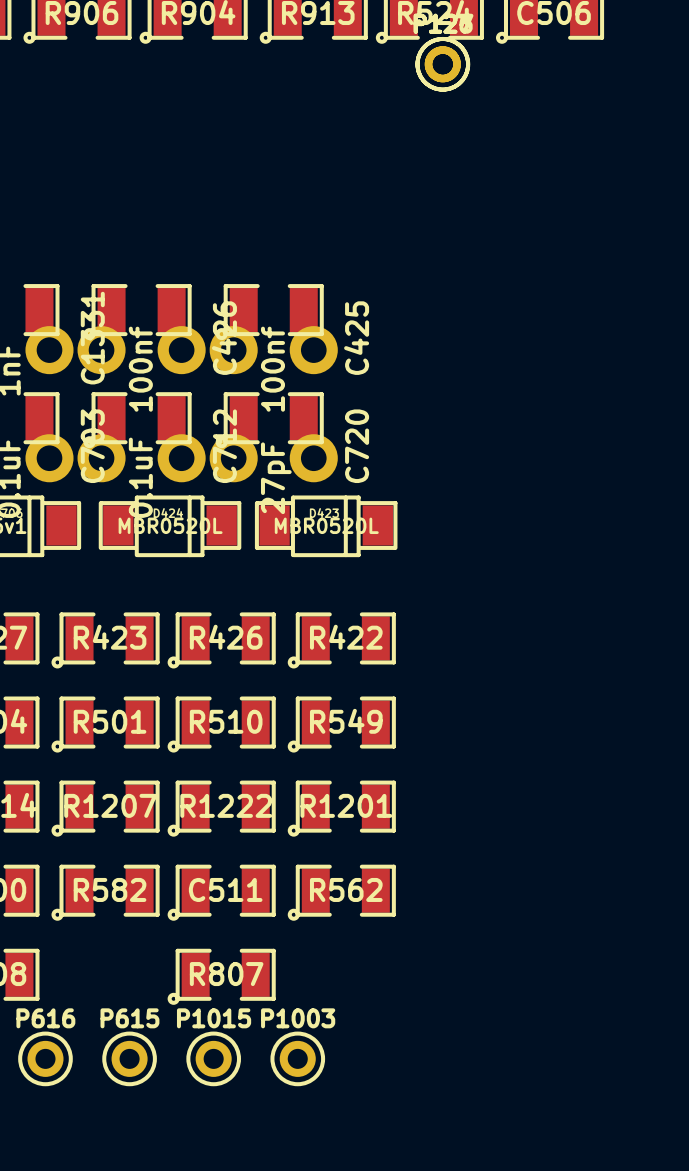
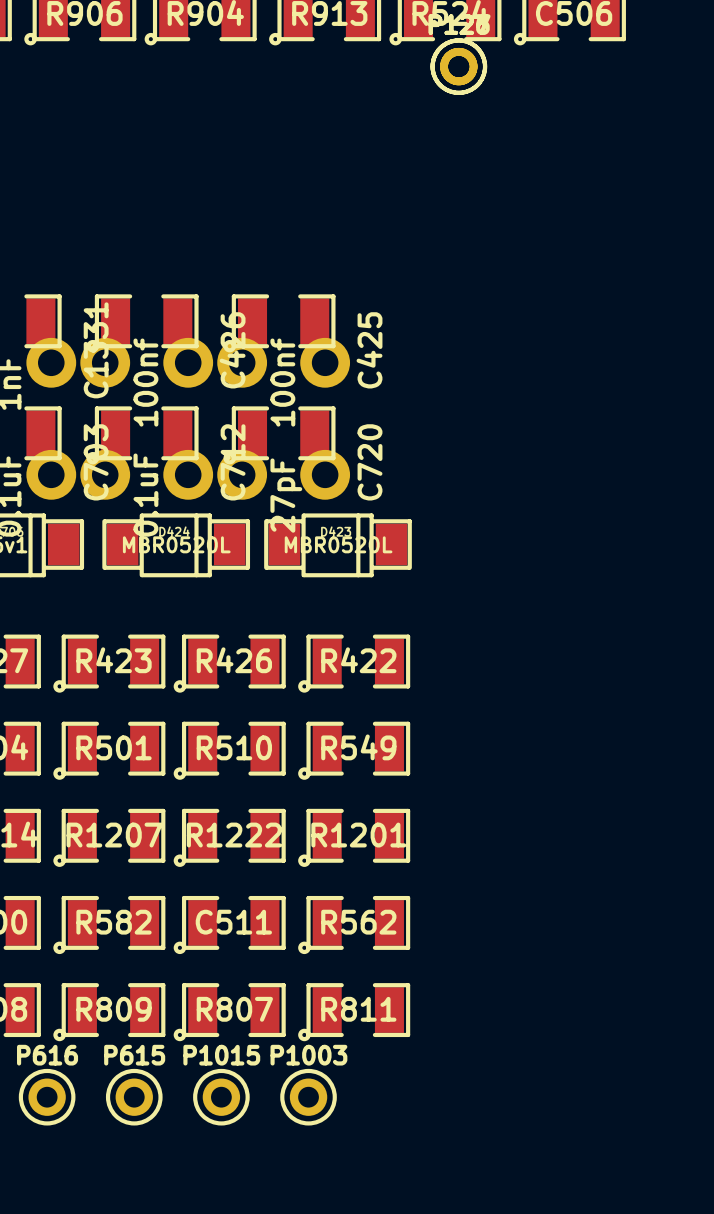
R809: none -> (109, 1012)
R811: none -> (354, 1012)

